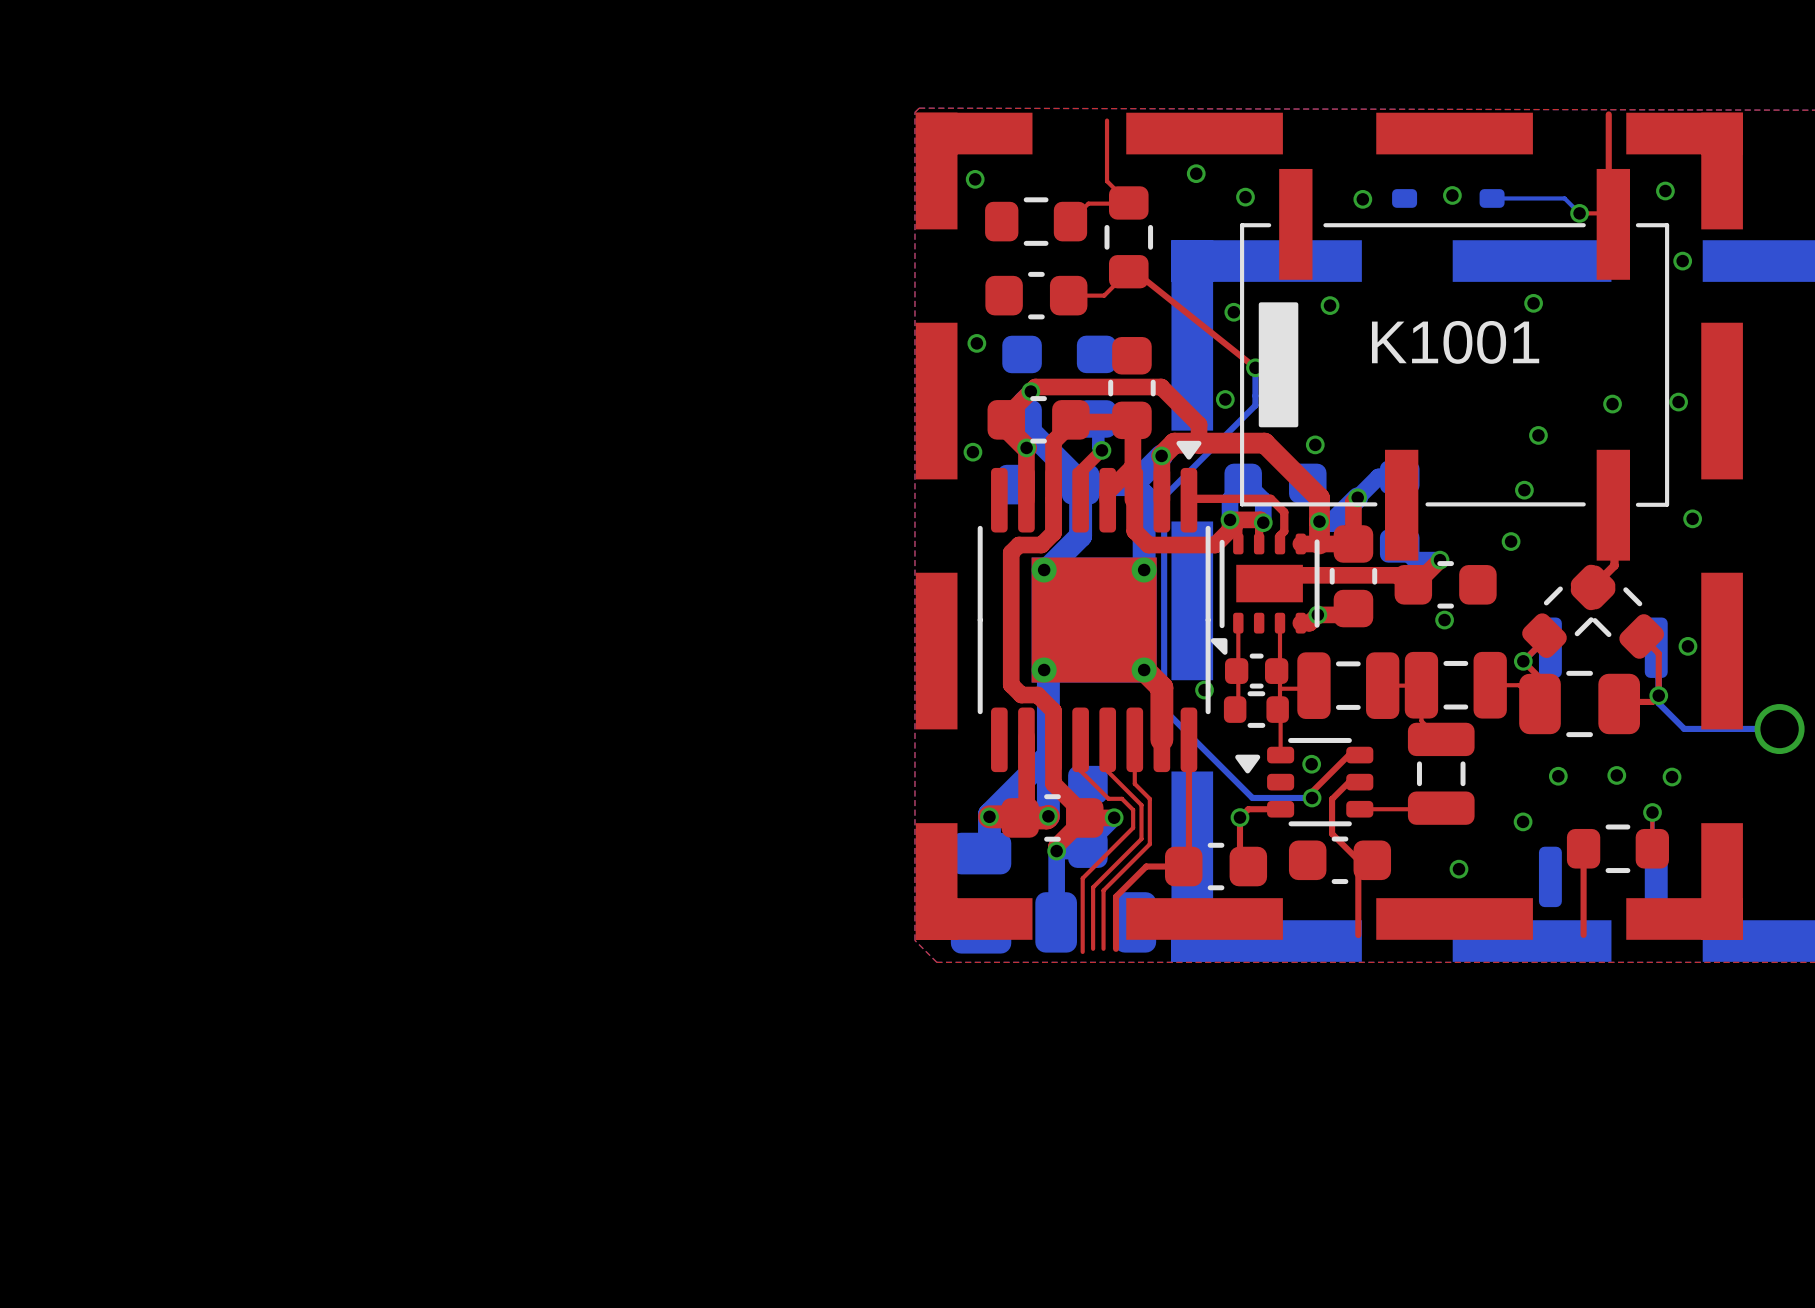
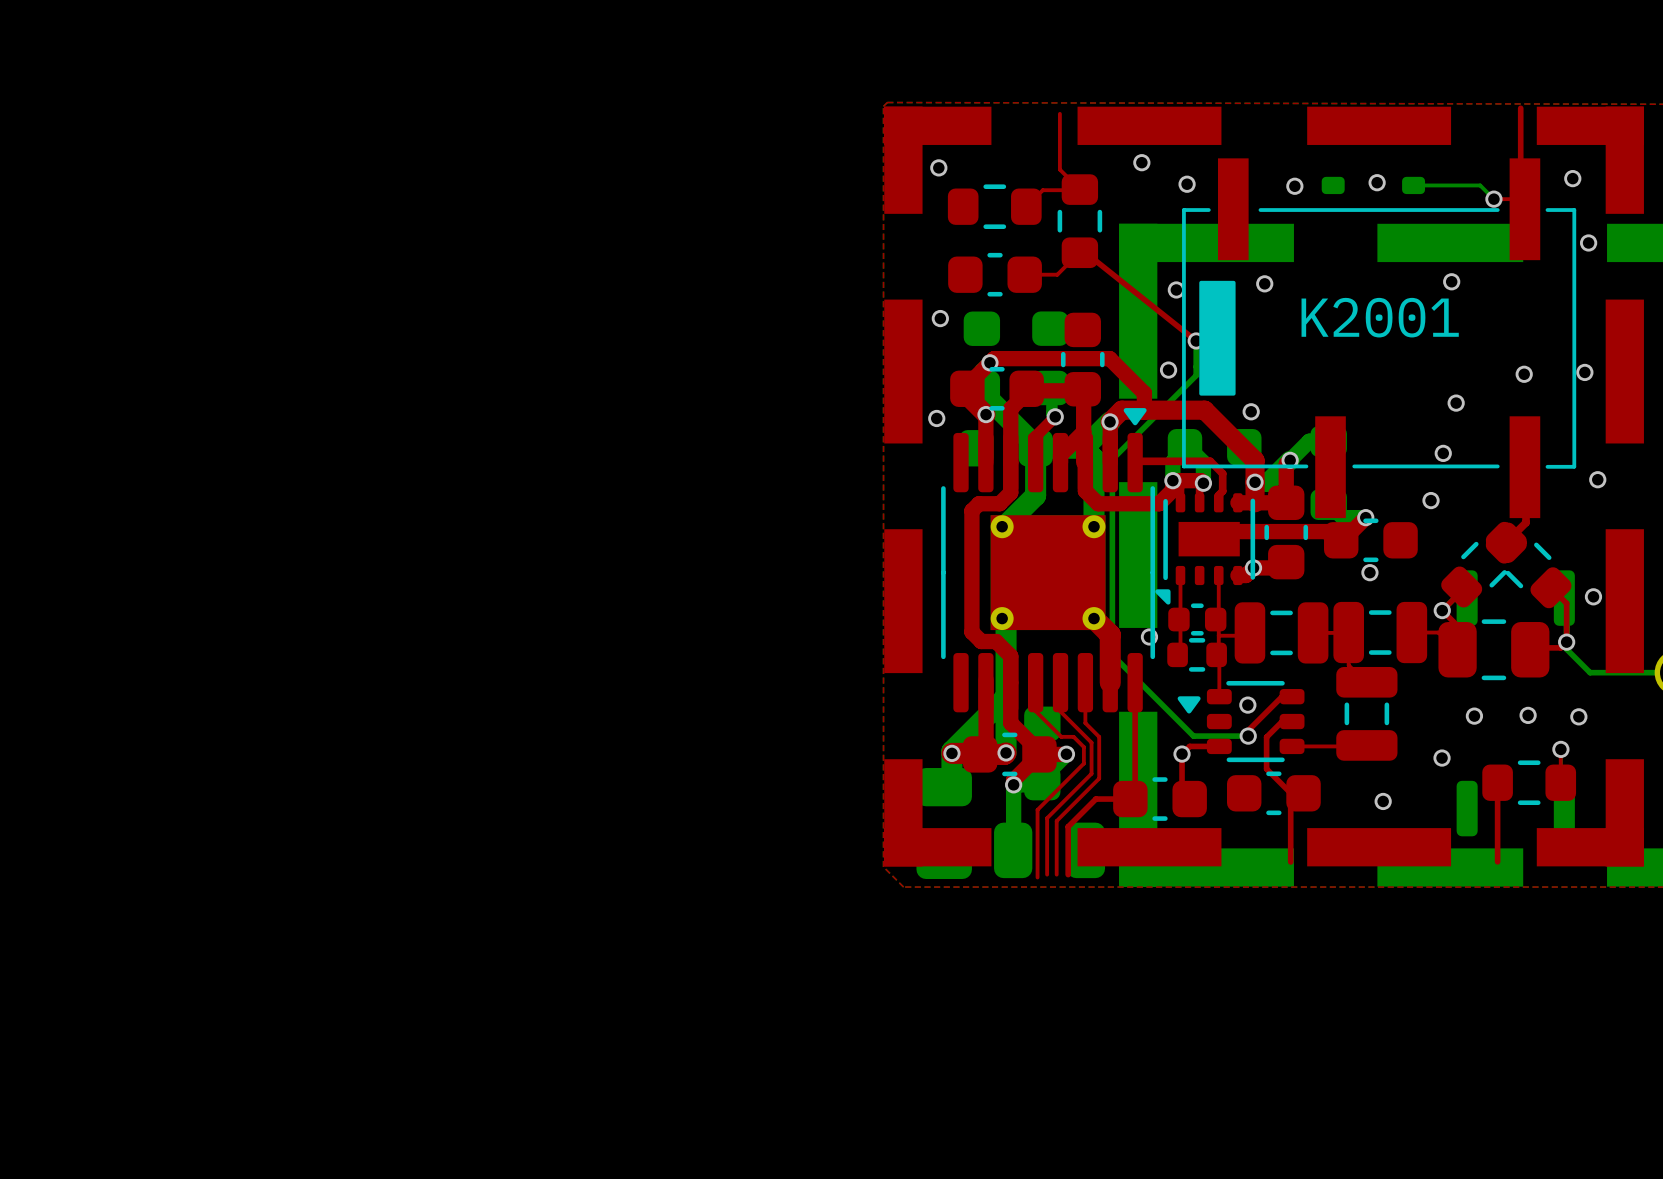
K1001 name: K1001 (1455, 342) -> K2001 (1380, 317)

